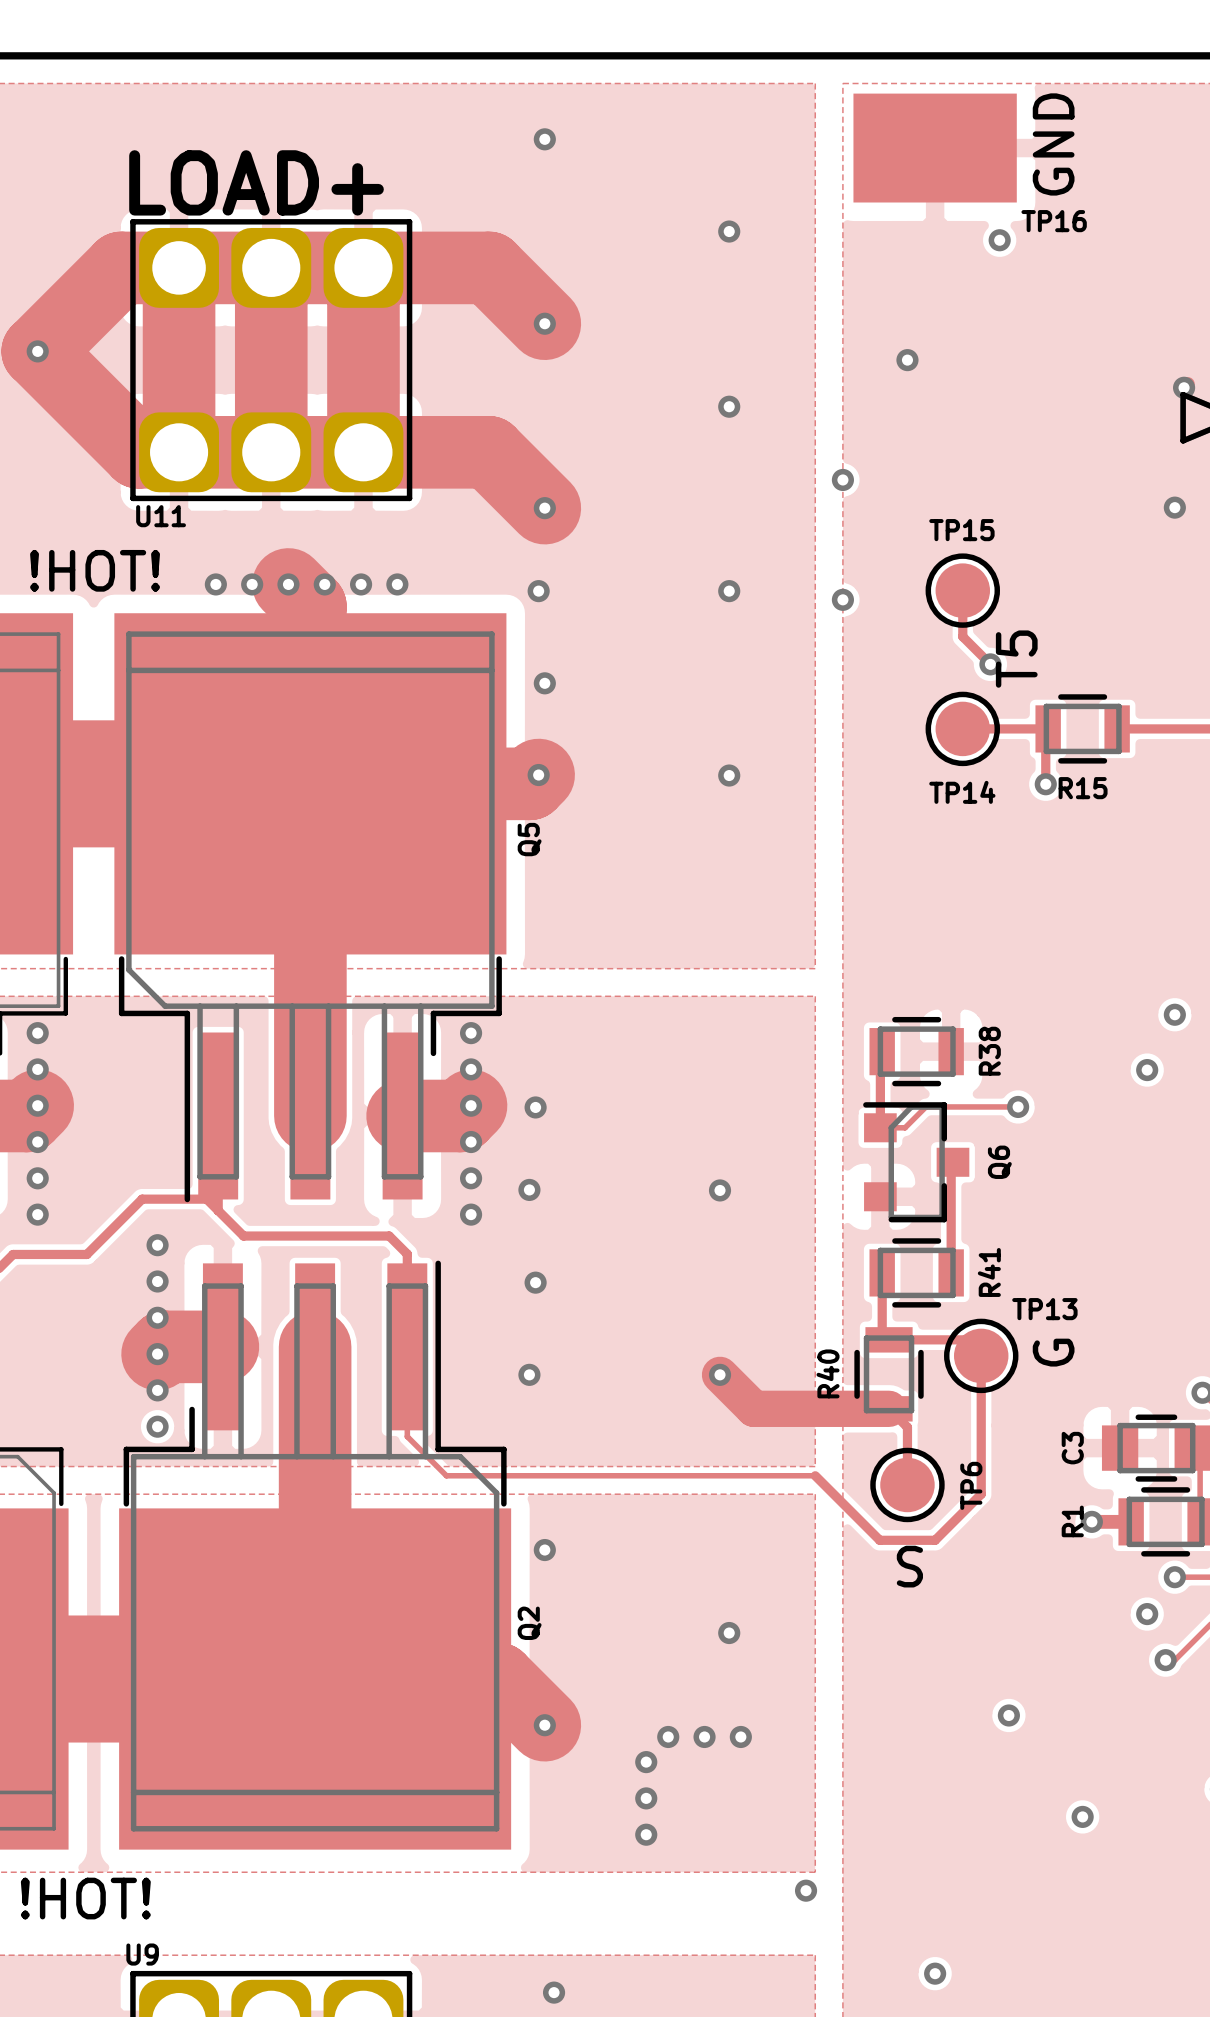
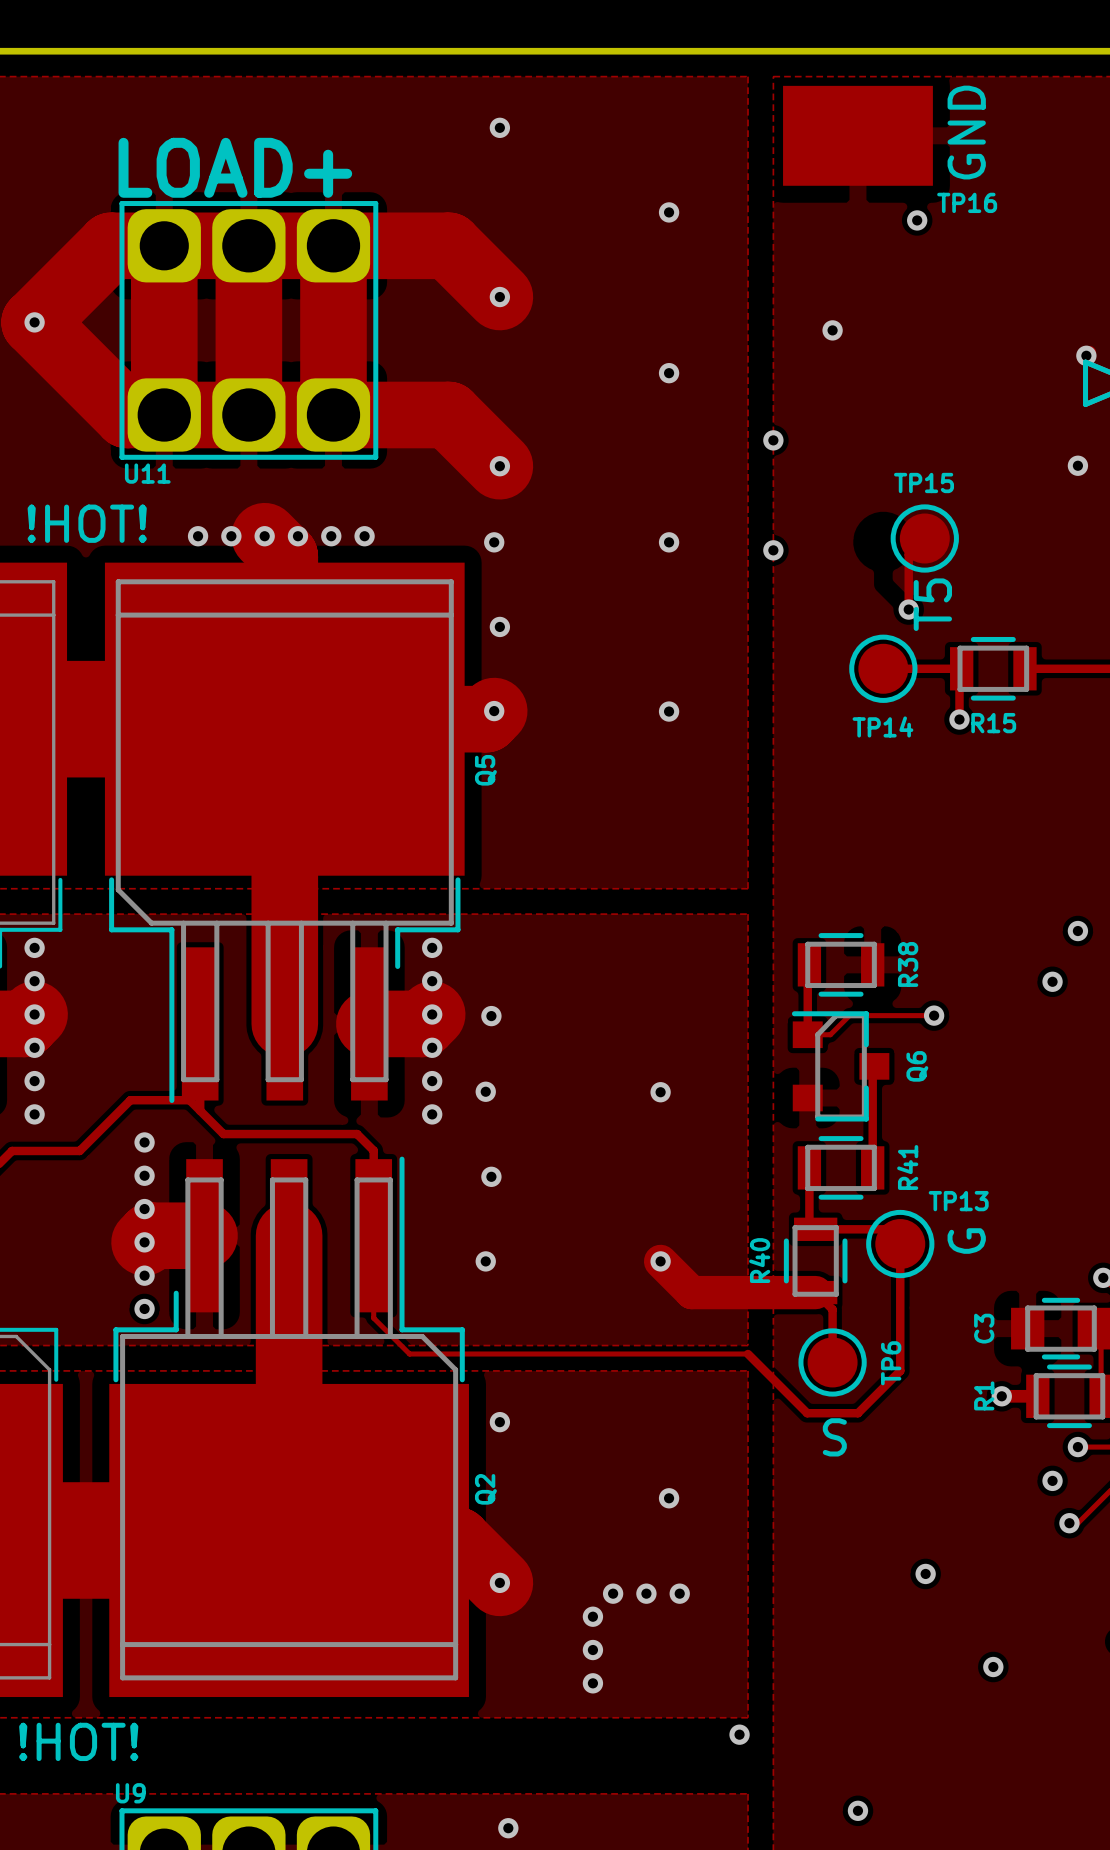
track: (962, 590) (962, 636) (990, 664) -> (924, 538) (908, 554) (908, 609)
TP15 position: (962, 590) -> (924, 538)

